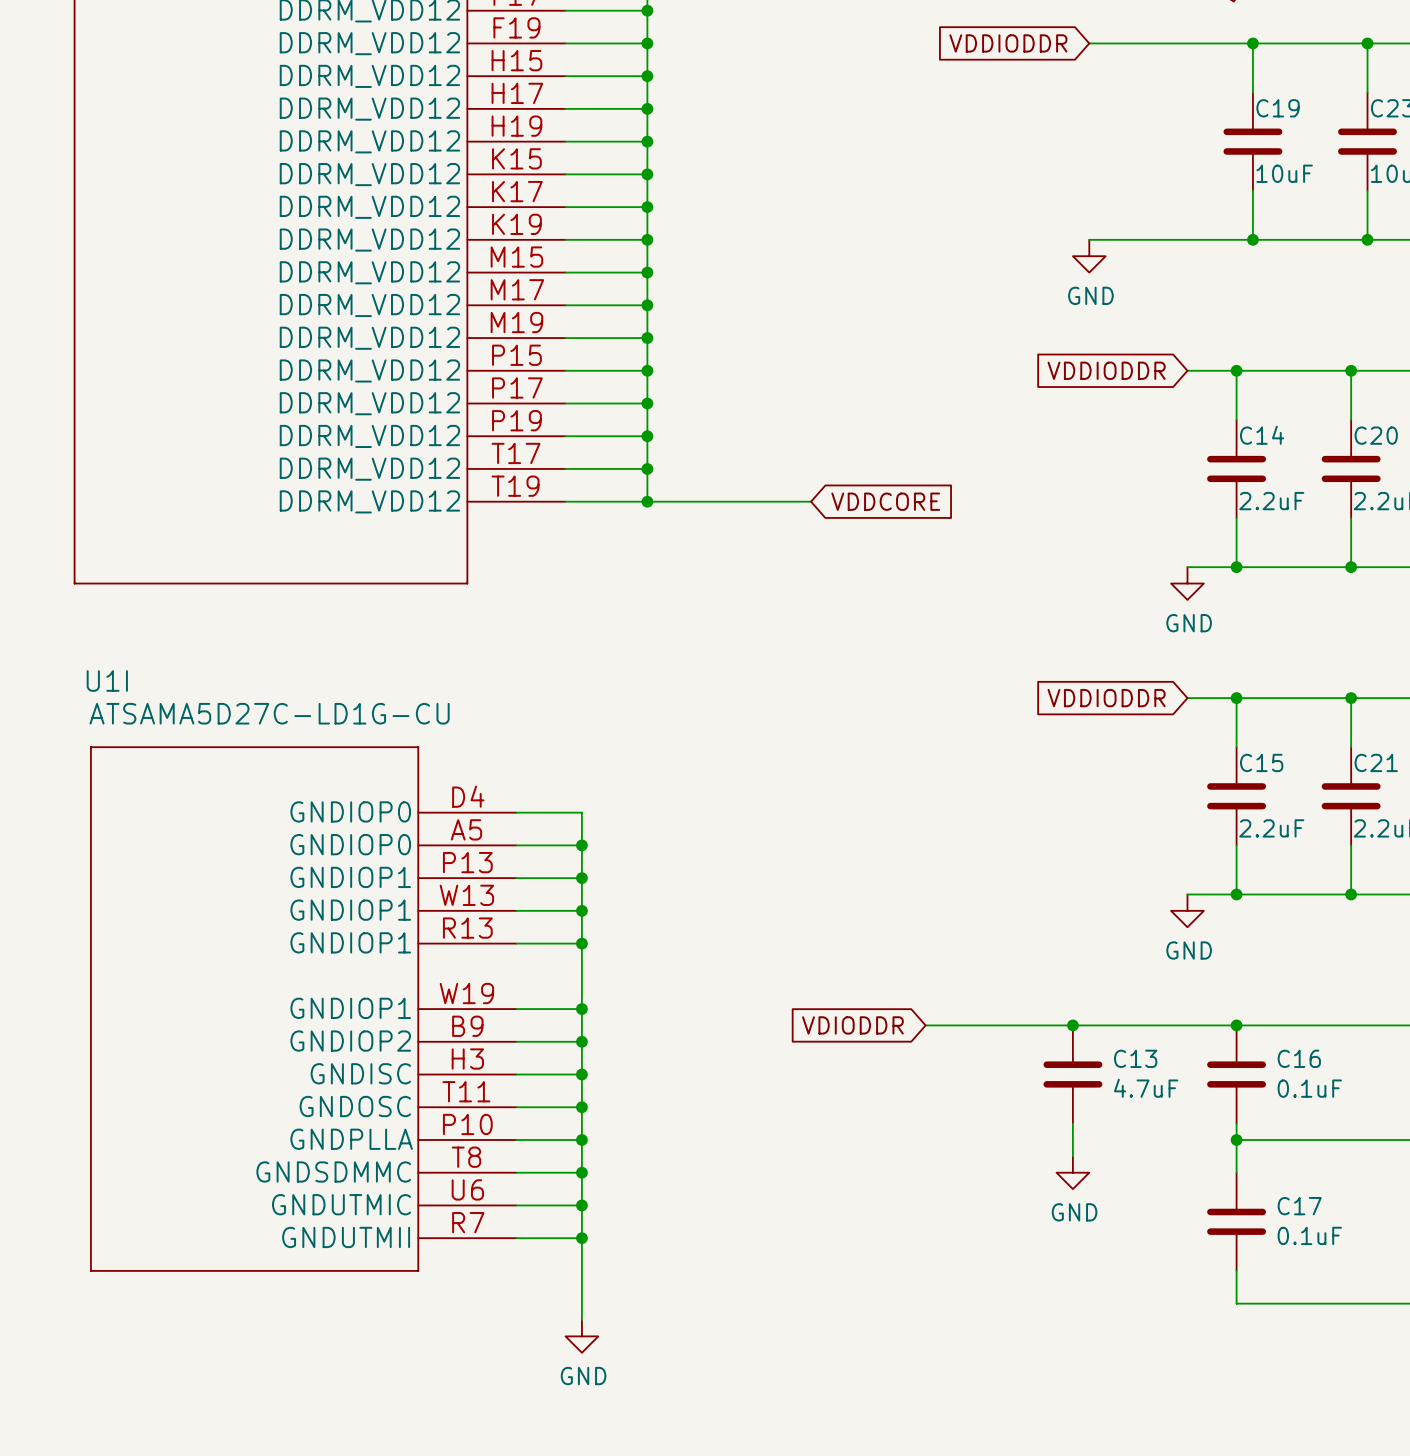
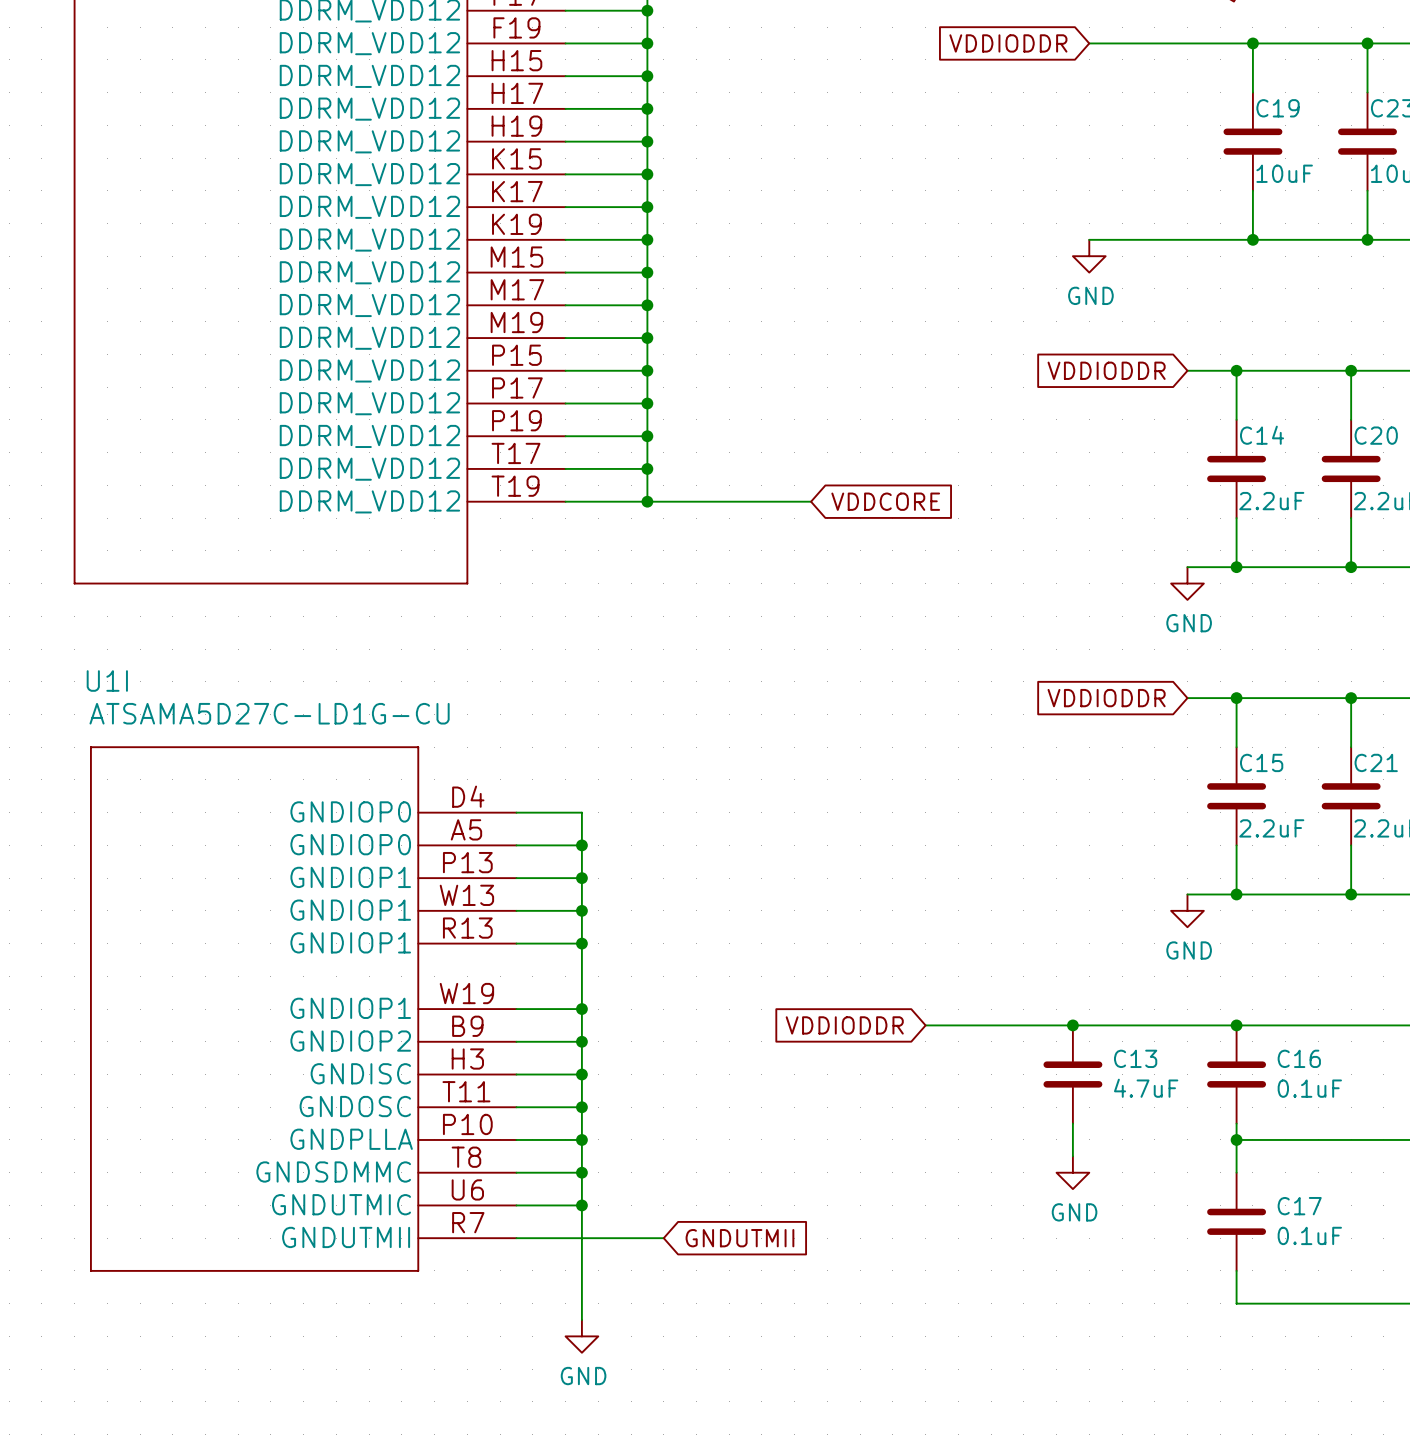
global label: VDIODDR (852, 1025) -> VDDIODDR (844, 1025)
wire: none -> (581, 1238) (663, 1238)
junction: (581, 1238) -> none
global label: none -> GNDUTMII (739, 1238)

